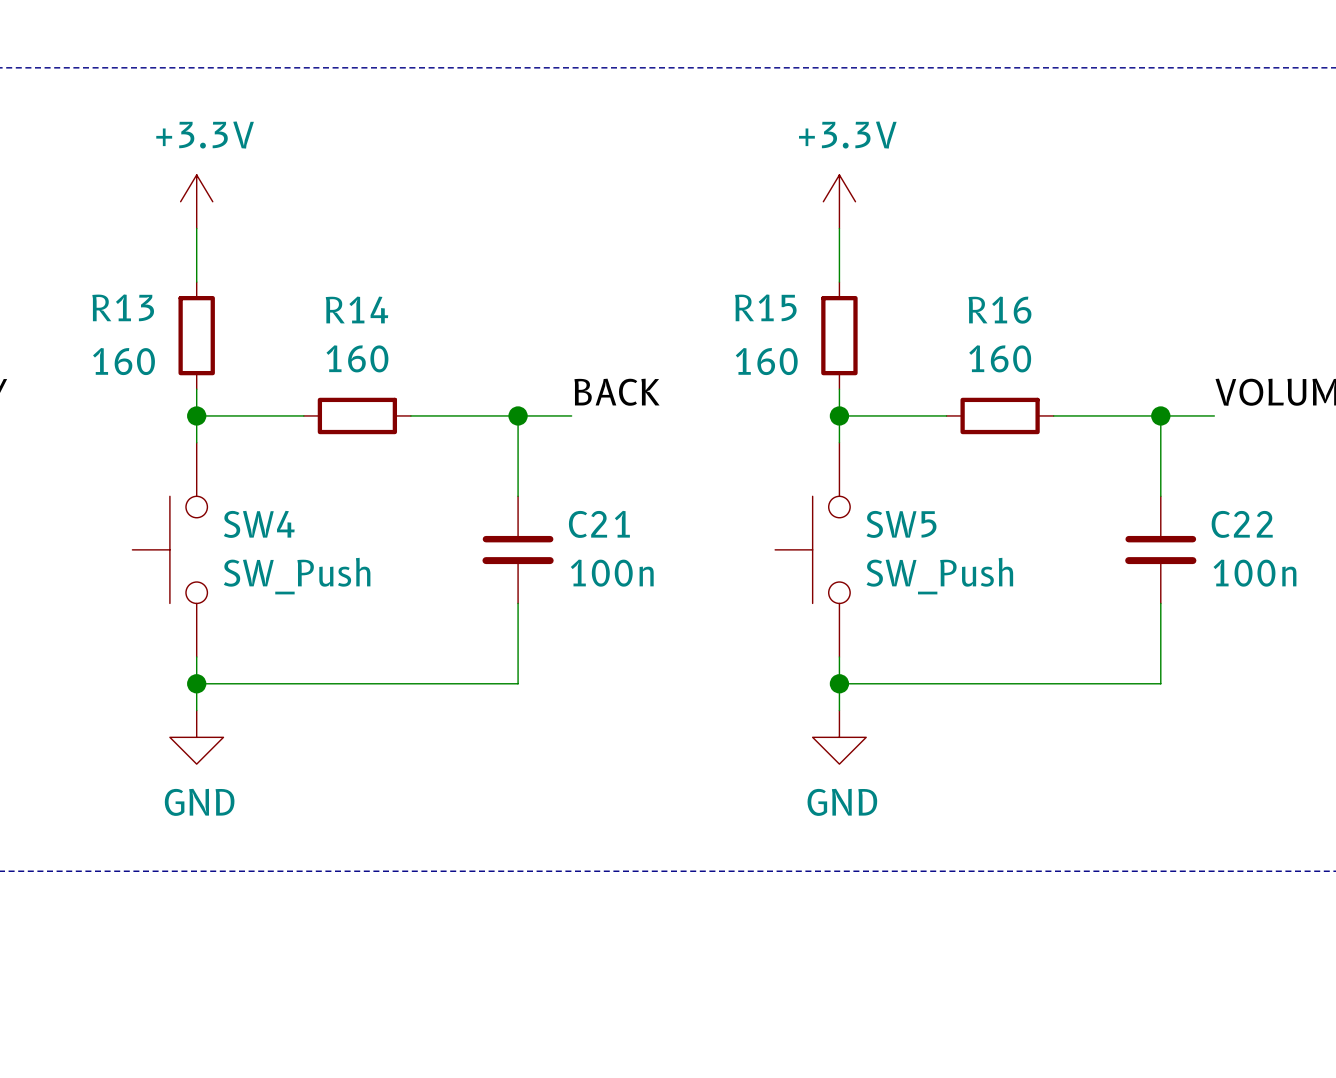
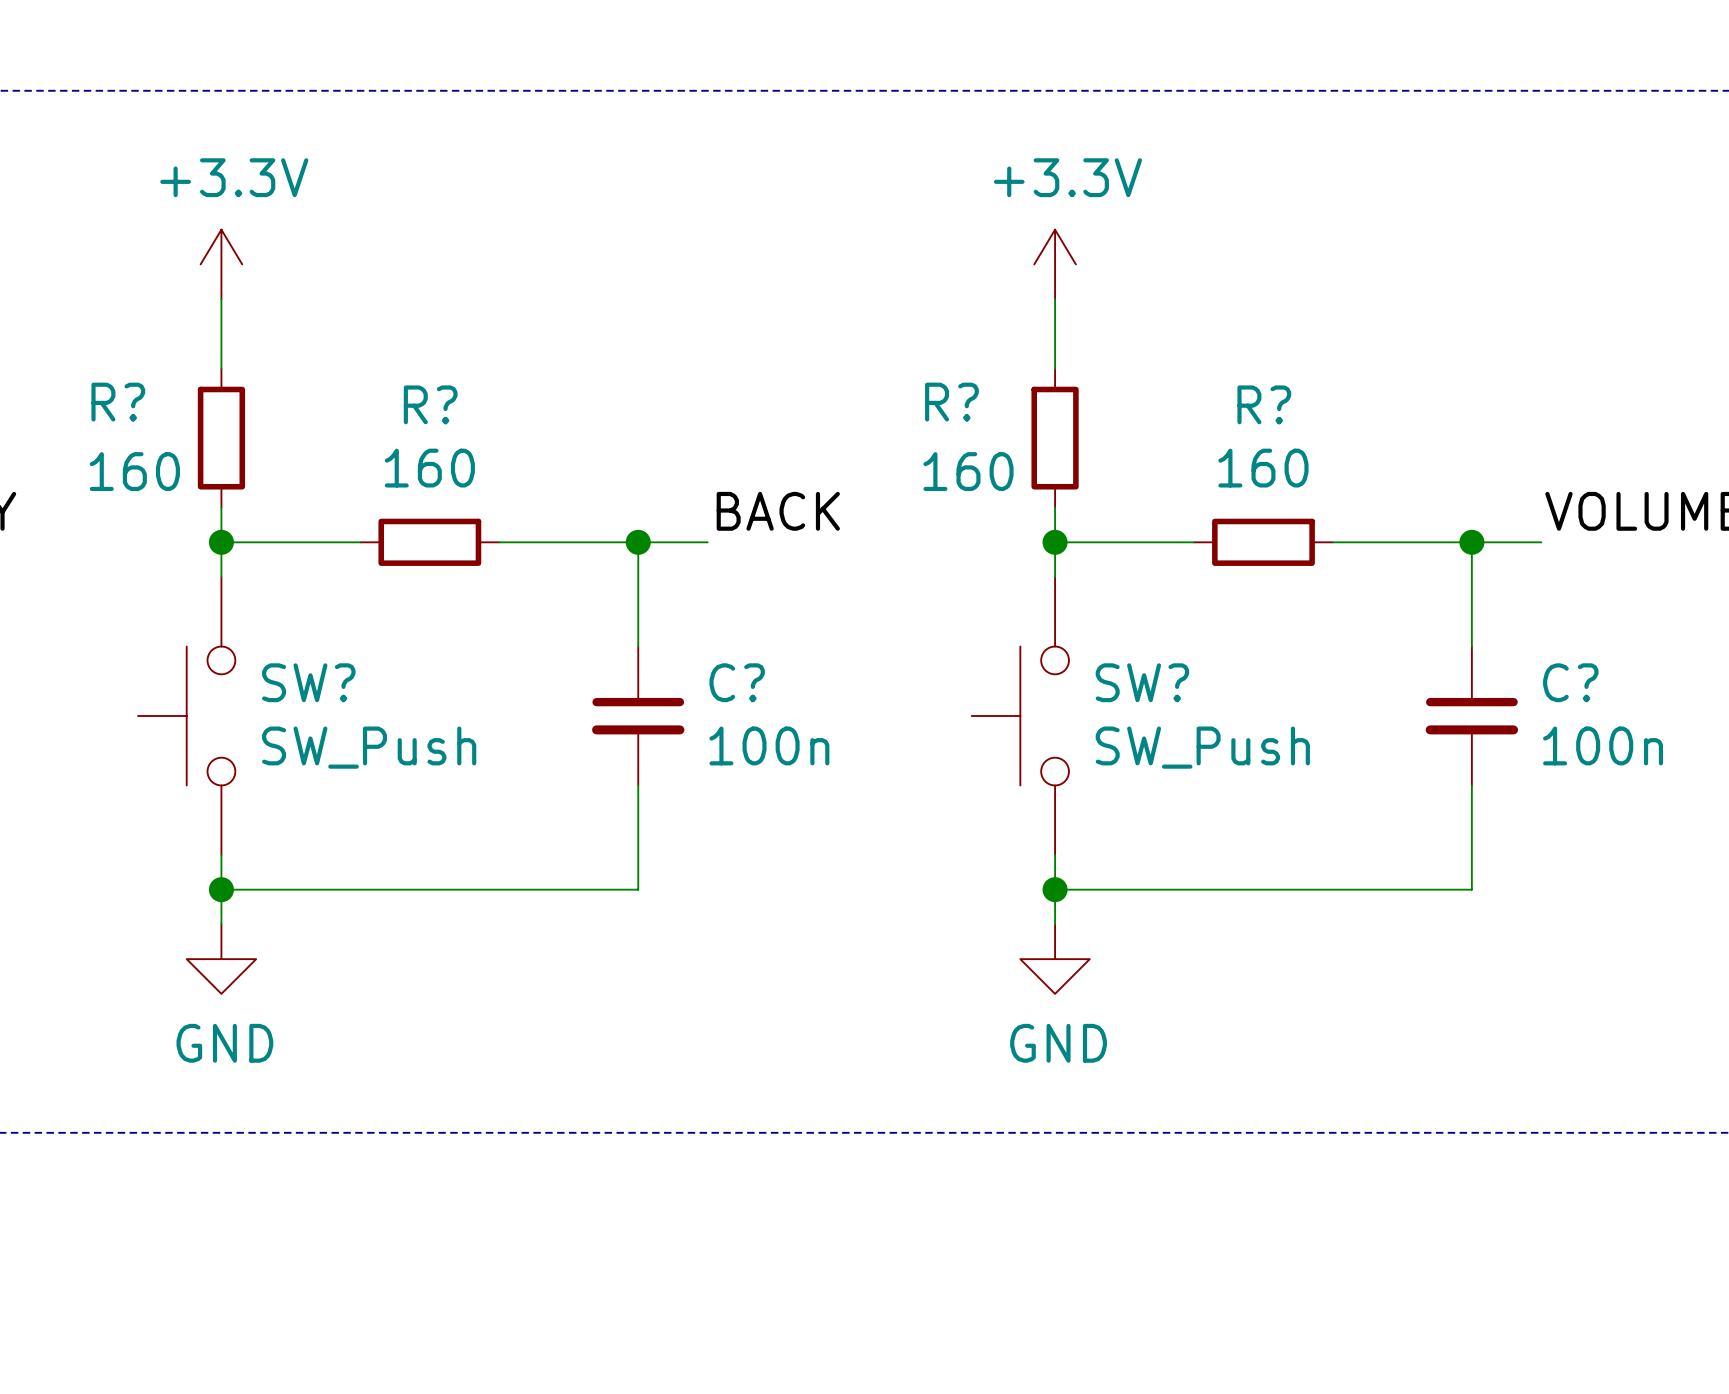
R13 name: R13 (123, 307) -> R? (118, 402)
R15 name: R15 (765, 307) -> R? (951, 402)
R14 name: R14 (356, 309) -> R? (430, 404)
R16 name: R16 (999, 310) -> R? (1264, 404)
SW4 name: SW4 (259, 524) -> SW? (308, 682)
C21 name: C21 (599, 524) -> C? (737, 682)
SW5 name: SW5 (901, 524) -> SW? (1142, 682)
C22 name: C22 (1242, 524) -> C? (1570, 682)

